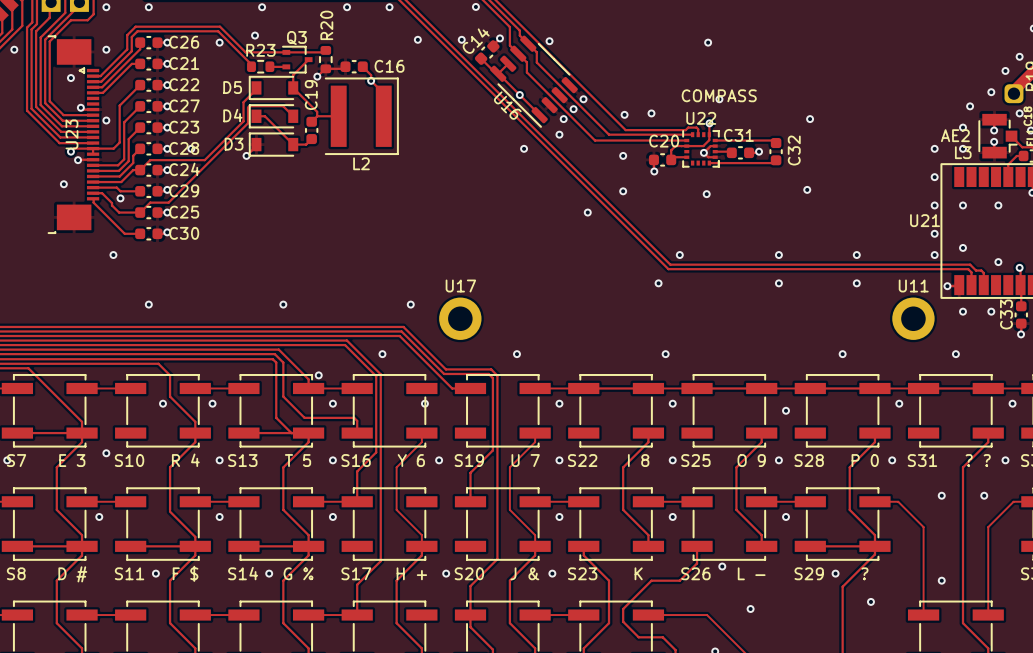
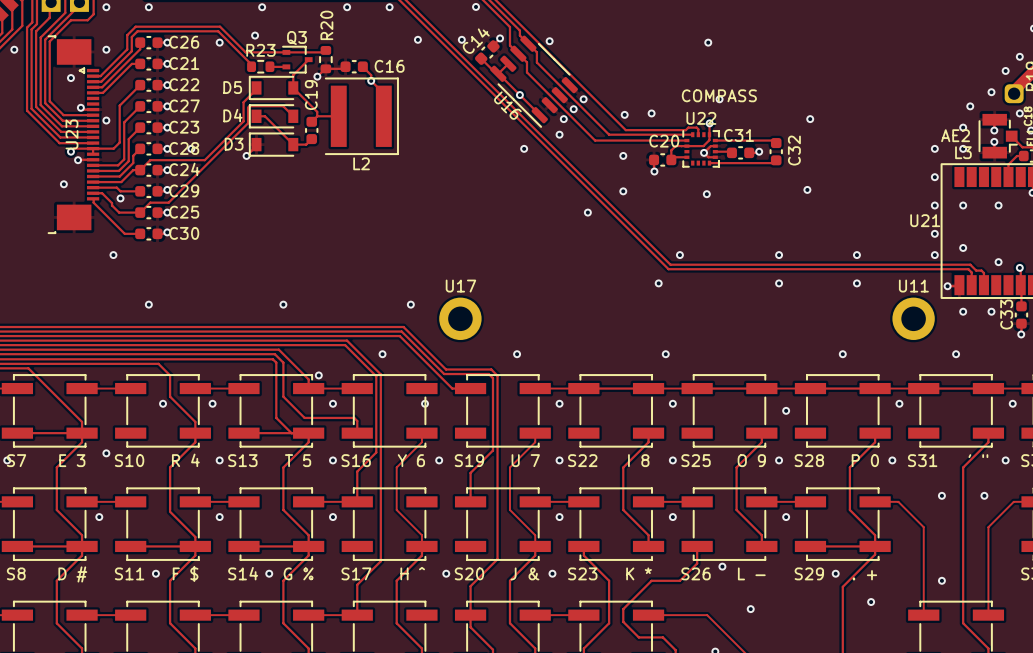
S31 text: ? ? (978, 460) -> ' " (978, 456)
S17 text: H + (411, 573) -> H ^ (412, 573)
S23 text: K (638, 573) -> K * (639, 573)
S29 text: ? (864, 573) -> . + (864, 575)

